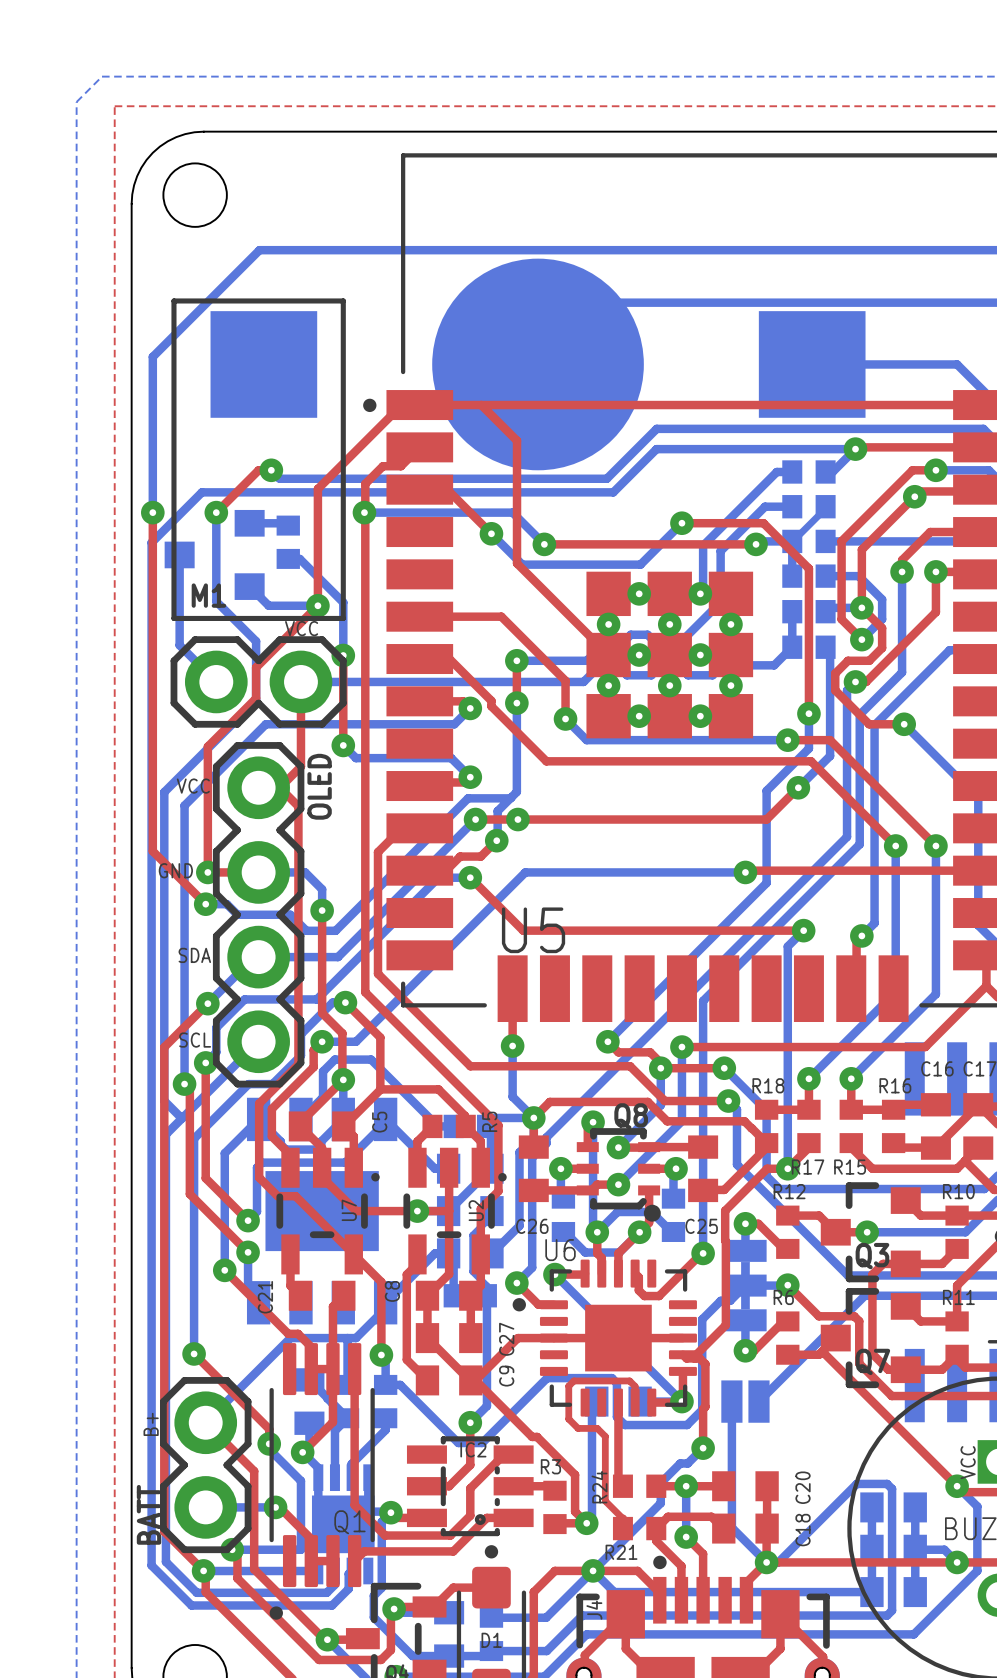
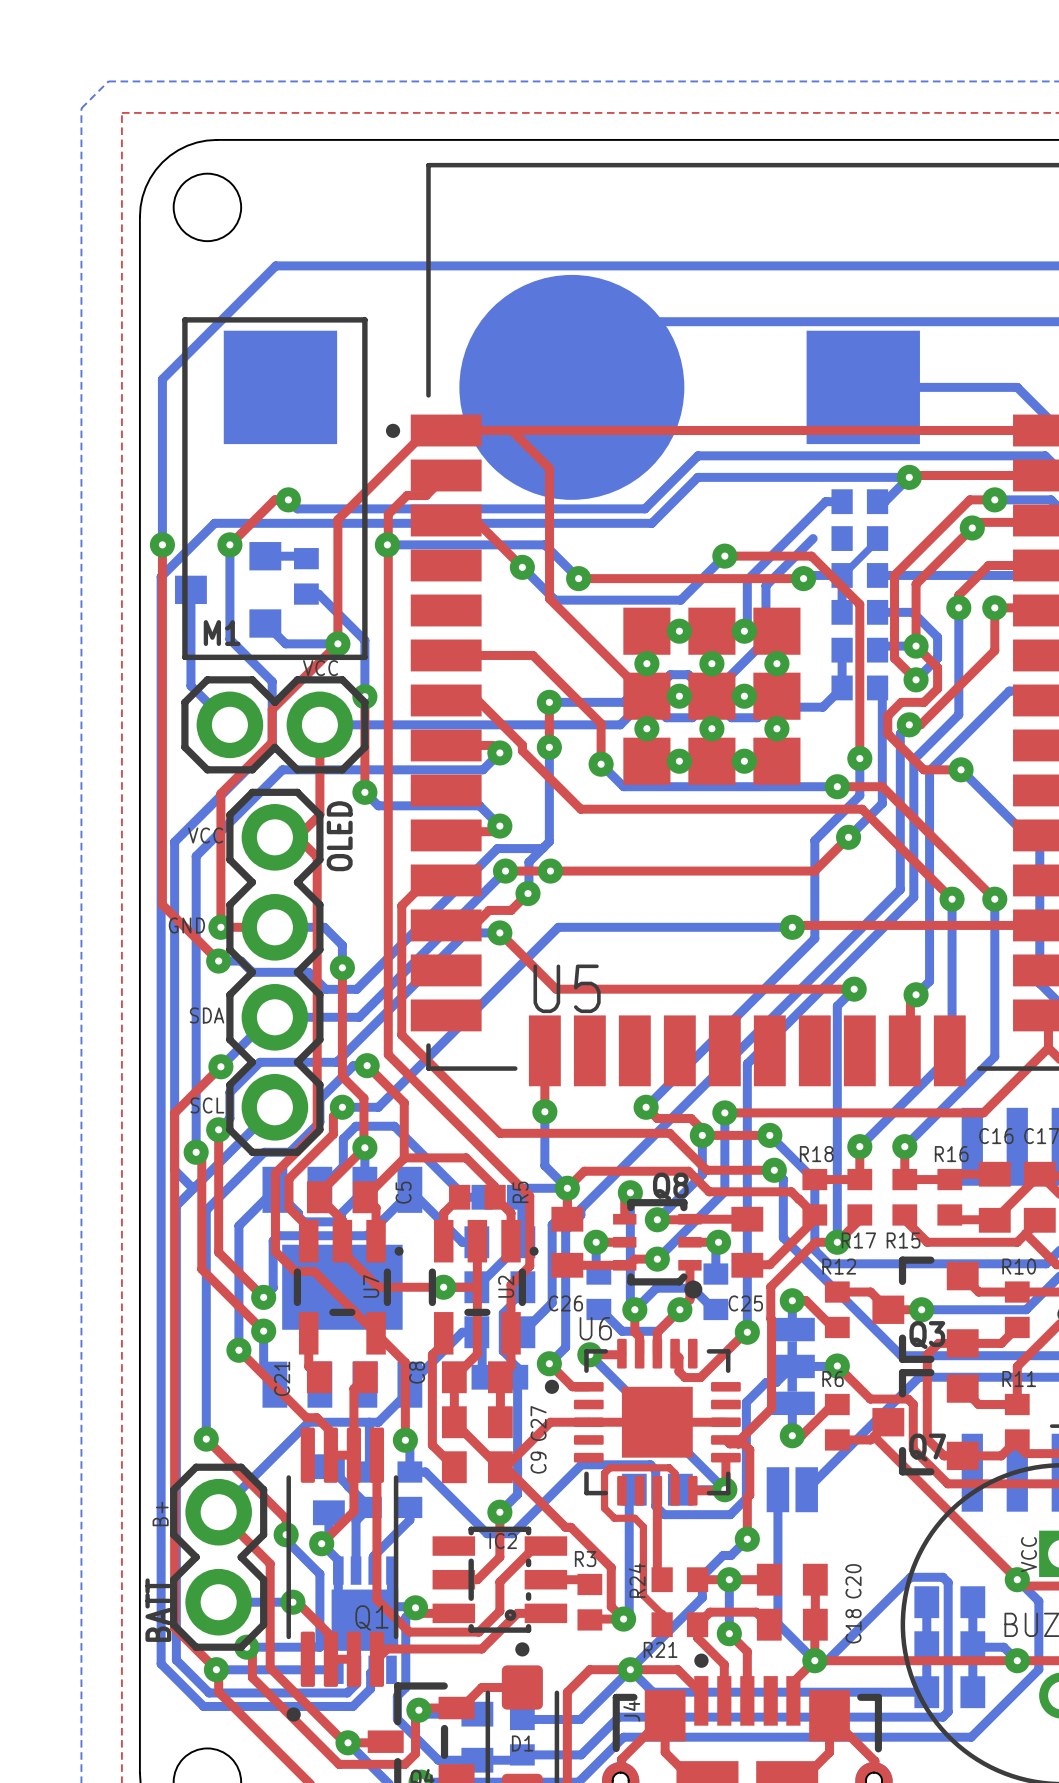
bottom track: (765, 506) (792, 506) -> none

